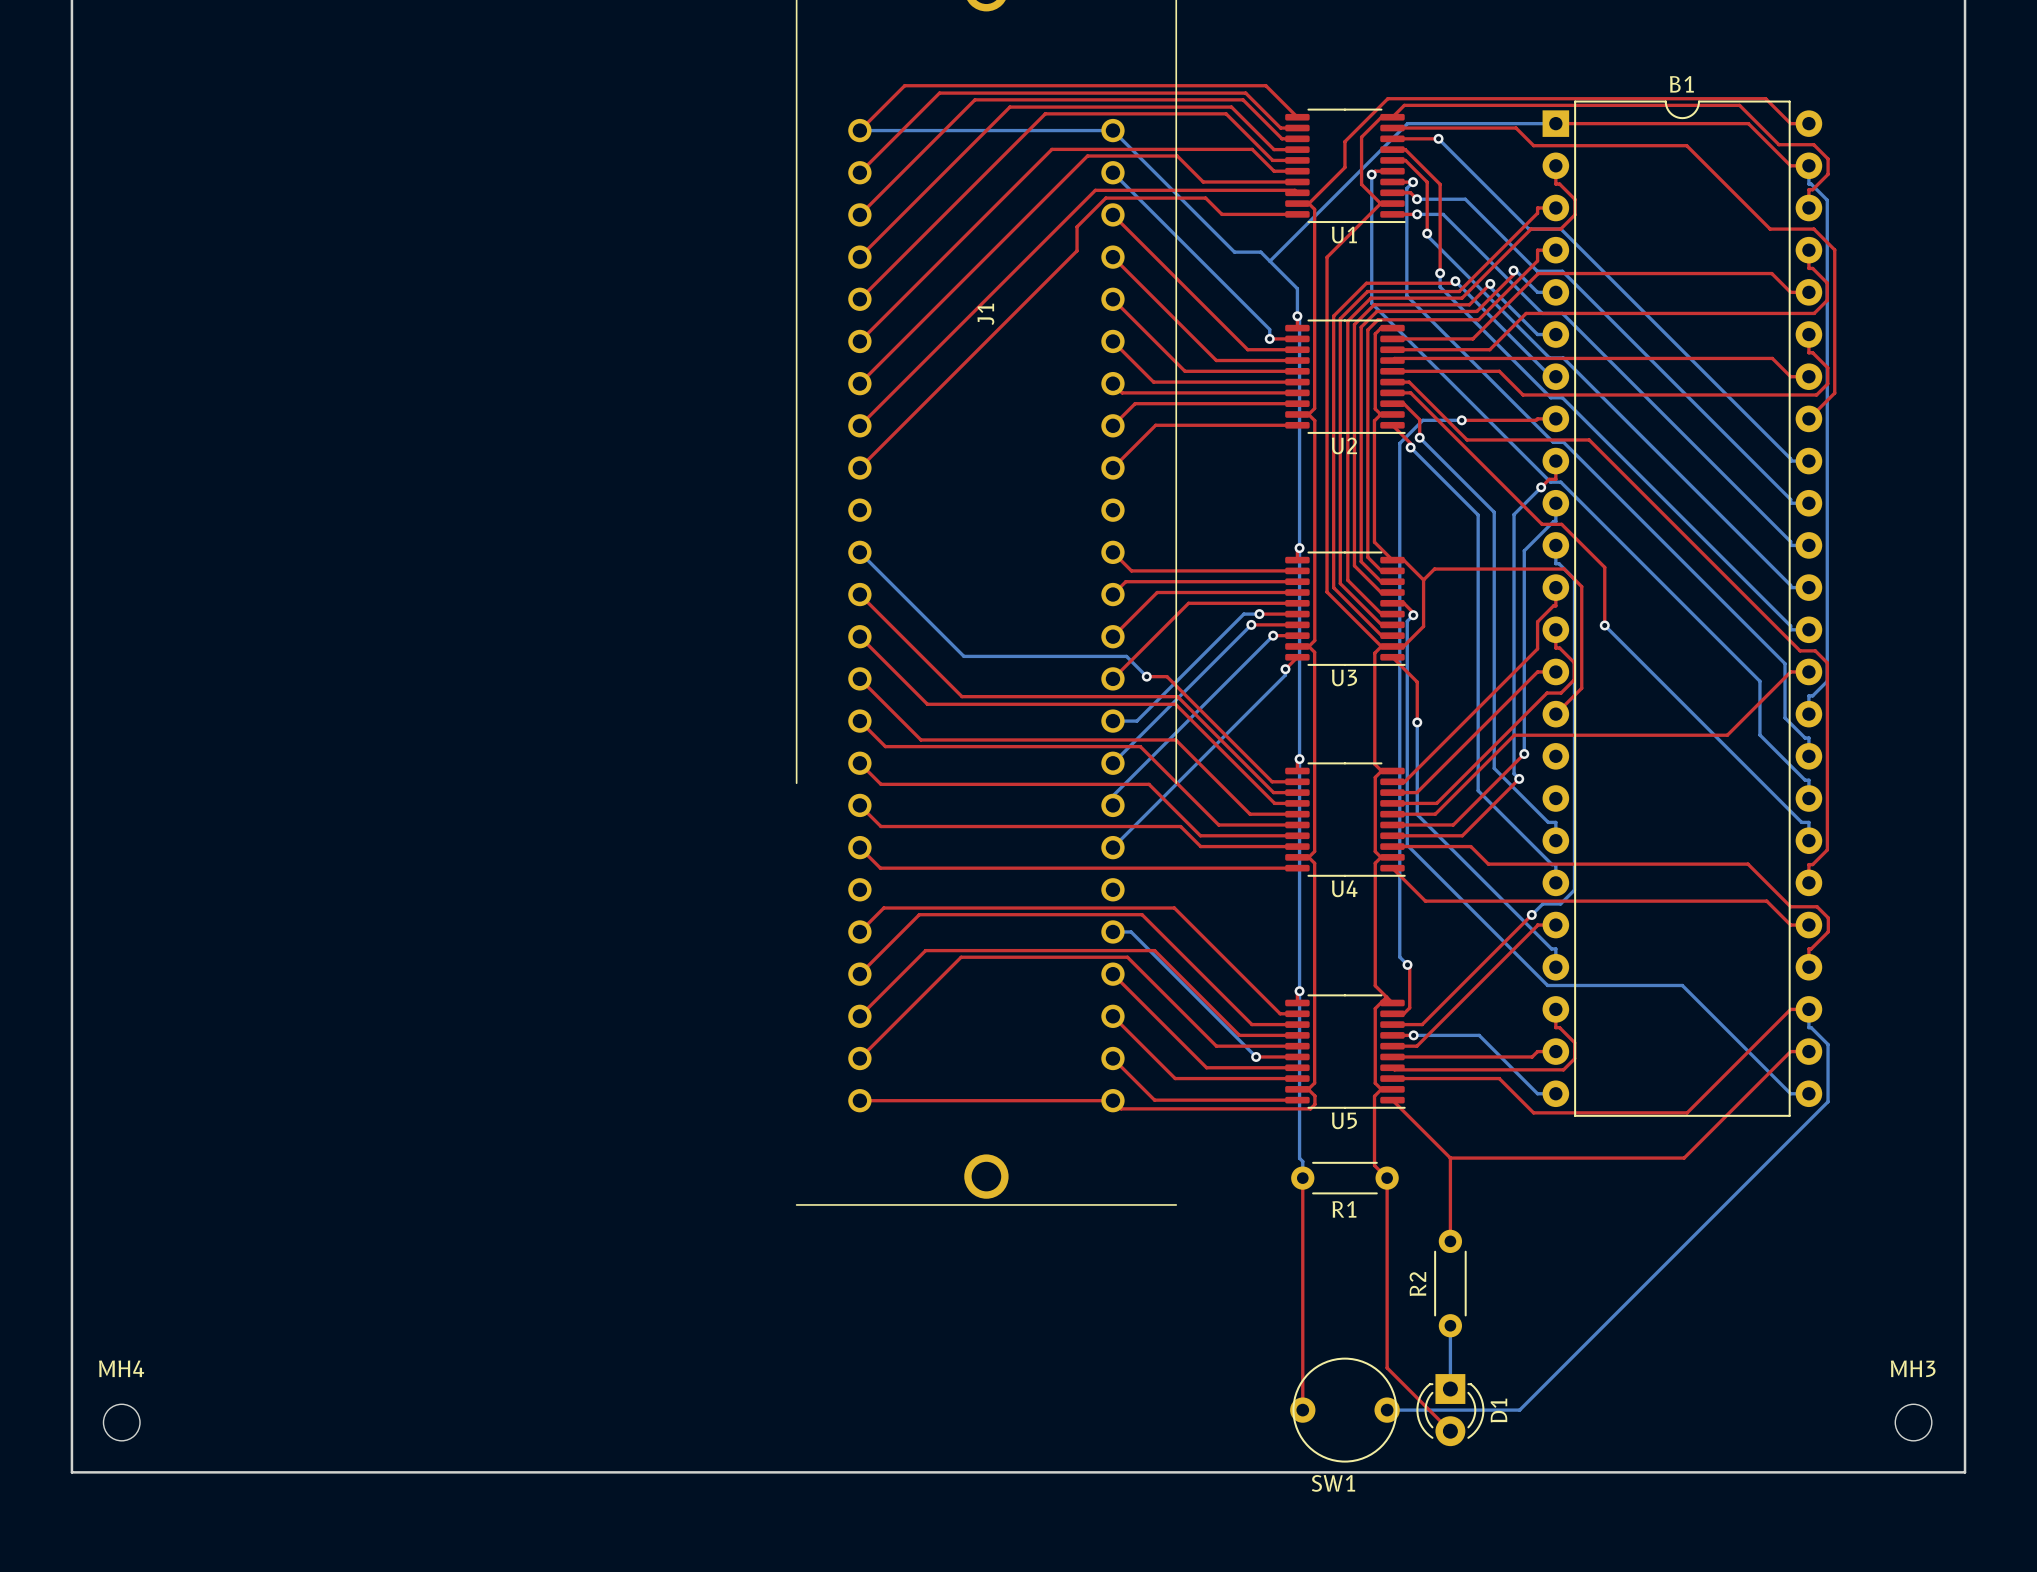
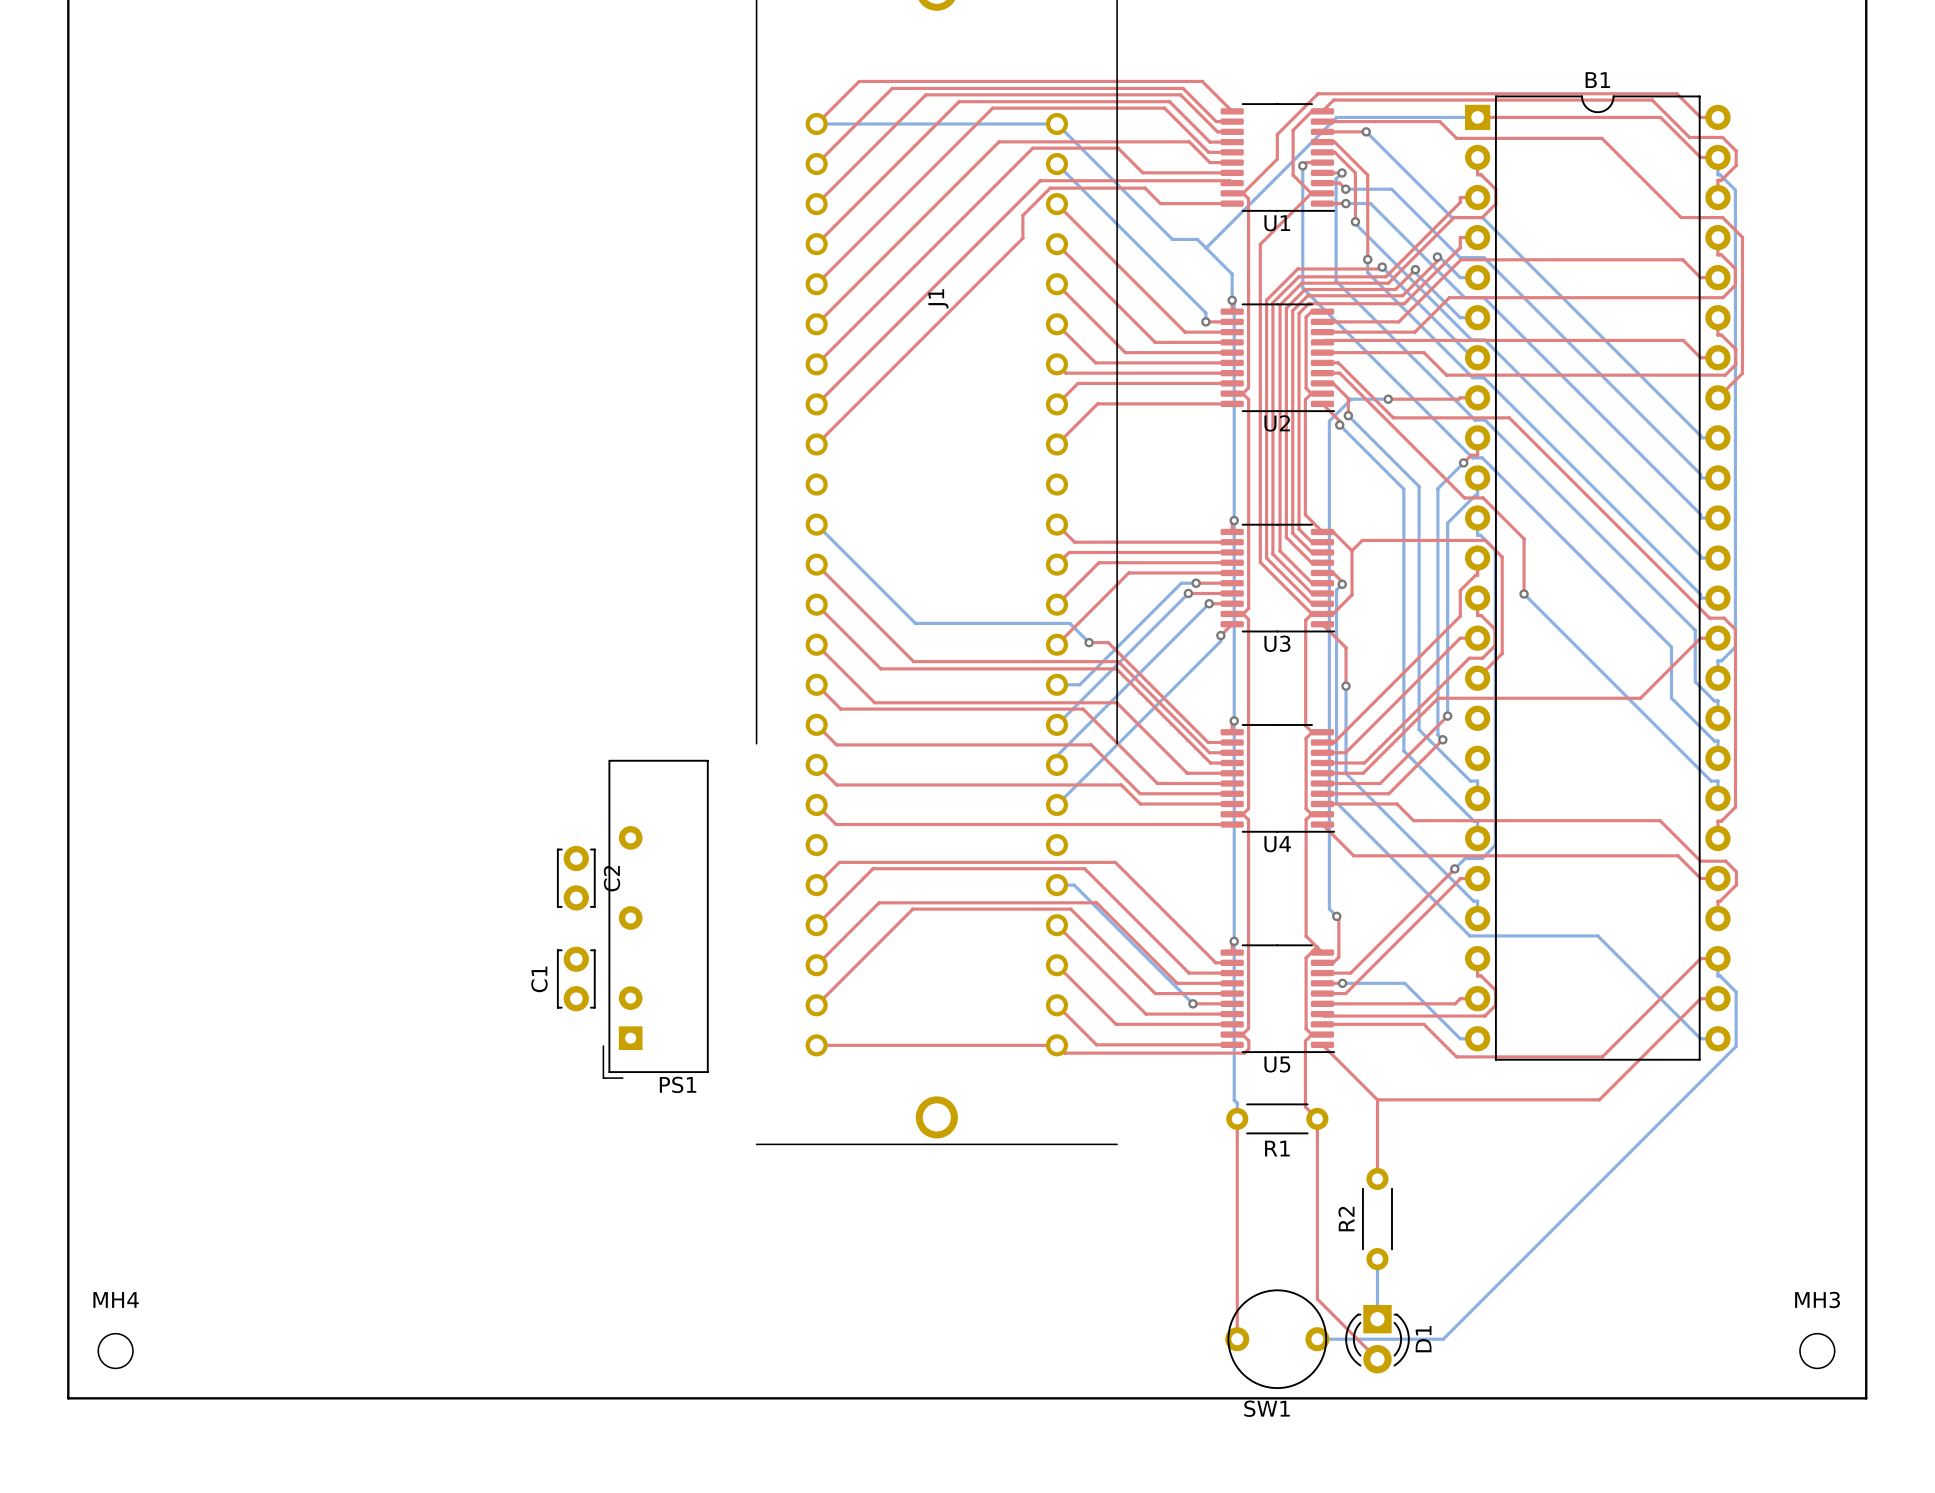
C2: none -> (576, 878)
PS1: none -> (655, 919)
C1: none -> (576, 978)

